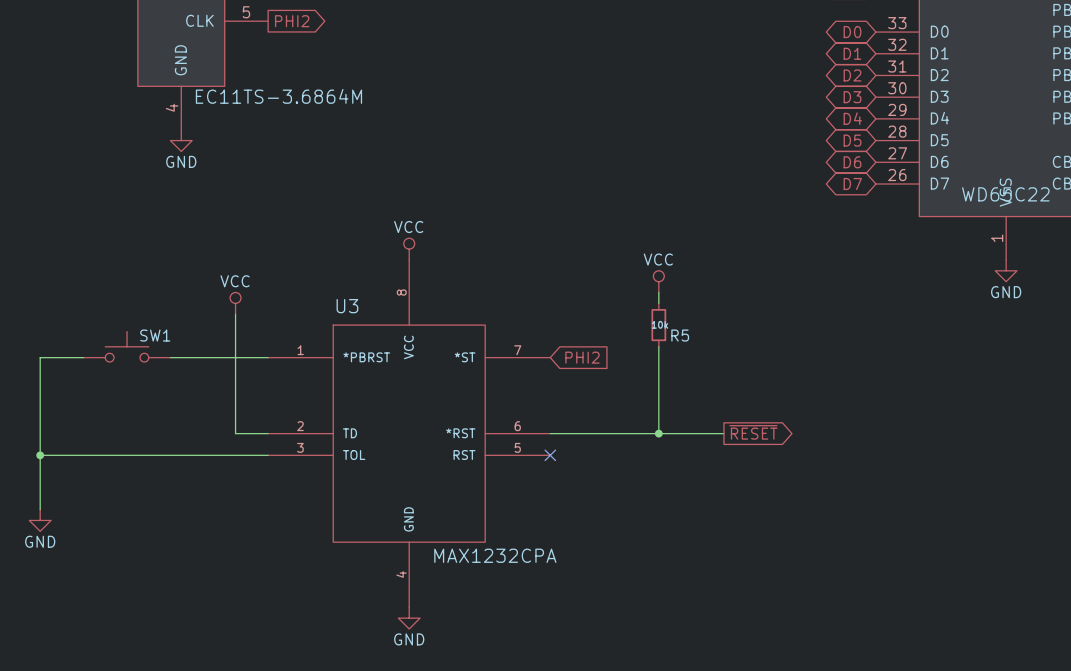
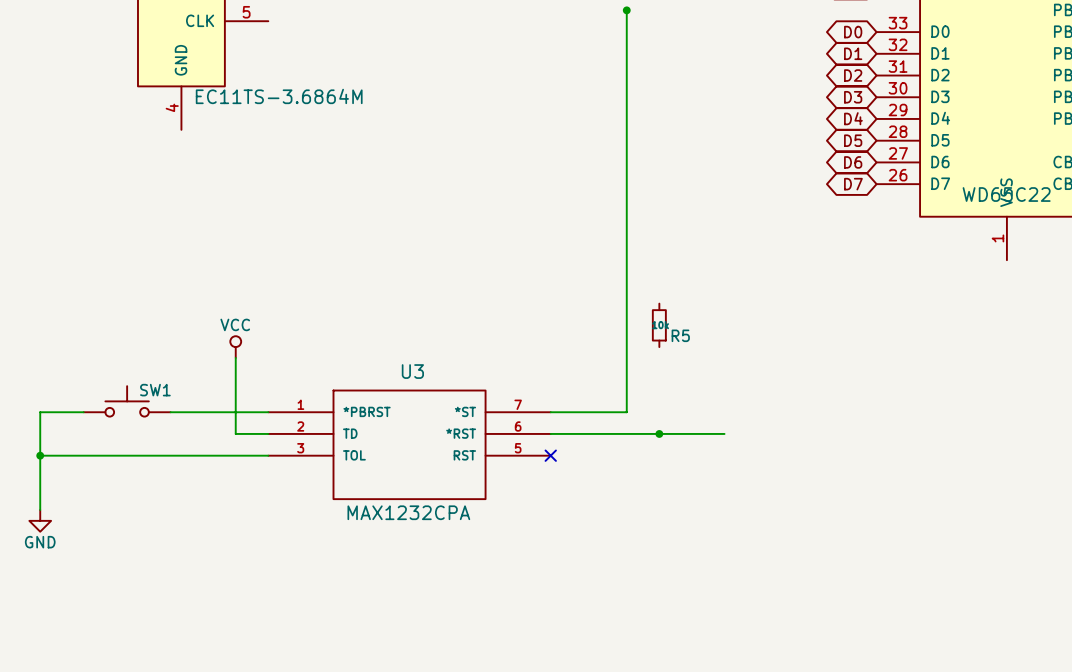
wire: none -> (626, 10) (626, 412) (550, 412)
junction: none -> (626, 10)
global label: PHI2 (292, 21) -> none
power symbol: GND (181, 140) -> none
power symbol: VCC (409, 249) -> none
U3 symbol: [268, 259, 551, 608] -> [268, 390, 551, 500]
power symbol: GND (1006, 270) -> none
power symbol: VCC (658, 281) -> none
wire: (658, 292) (658, 303) -> none
power symbol position: VCC (235, 303) -> VCC (235, 347)
U3 name position: U3 (347, 306) -> U3 (412, 371)
wire: (235, 314) (235, 357) -> none
SW1 position: (127, 346) -> (127, 401)
wire: (658, 346) (658, 433) -> none
wire: (83, 357) (40, 357) (40, 411) -> (83, 412) (40, 412)
wire: (170, 357) (268, 357) -> (170, 412) (268, 412)
global label: PHI2 (582, 357) -> none
global label: ~{RESET} (753, 432) -> none
U3 value position: MAX1232CPA (495, 555) -> MAX1232CPA (408, 512)
power symbol: GND (409, 618) -> none

